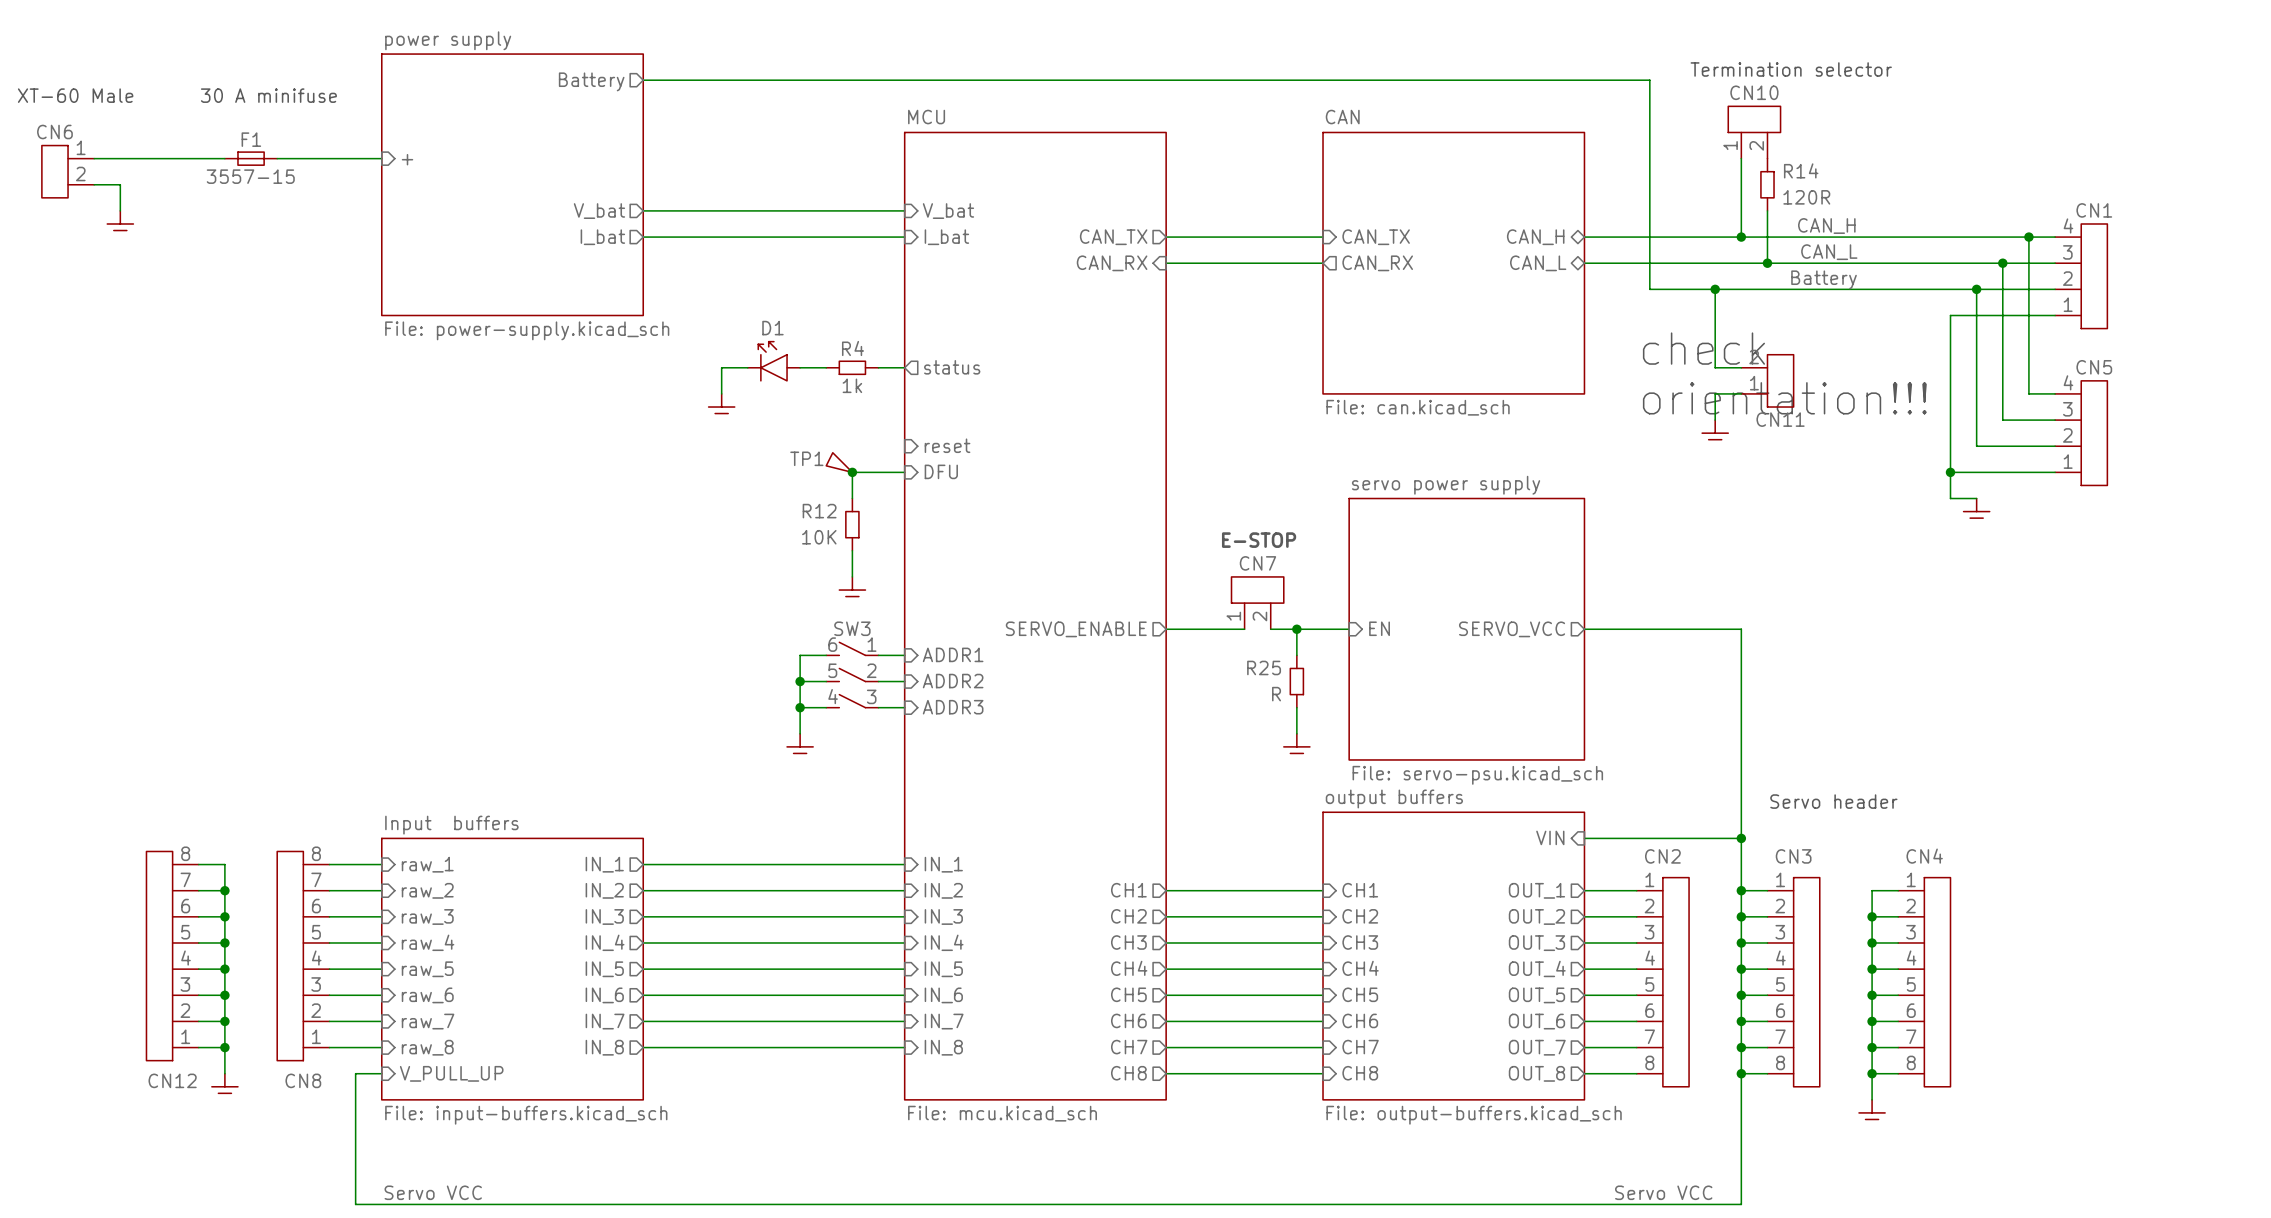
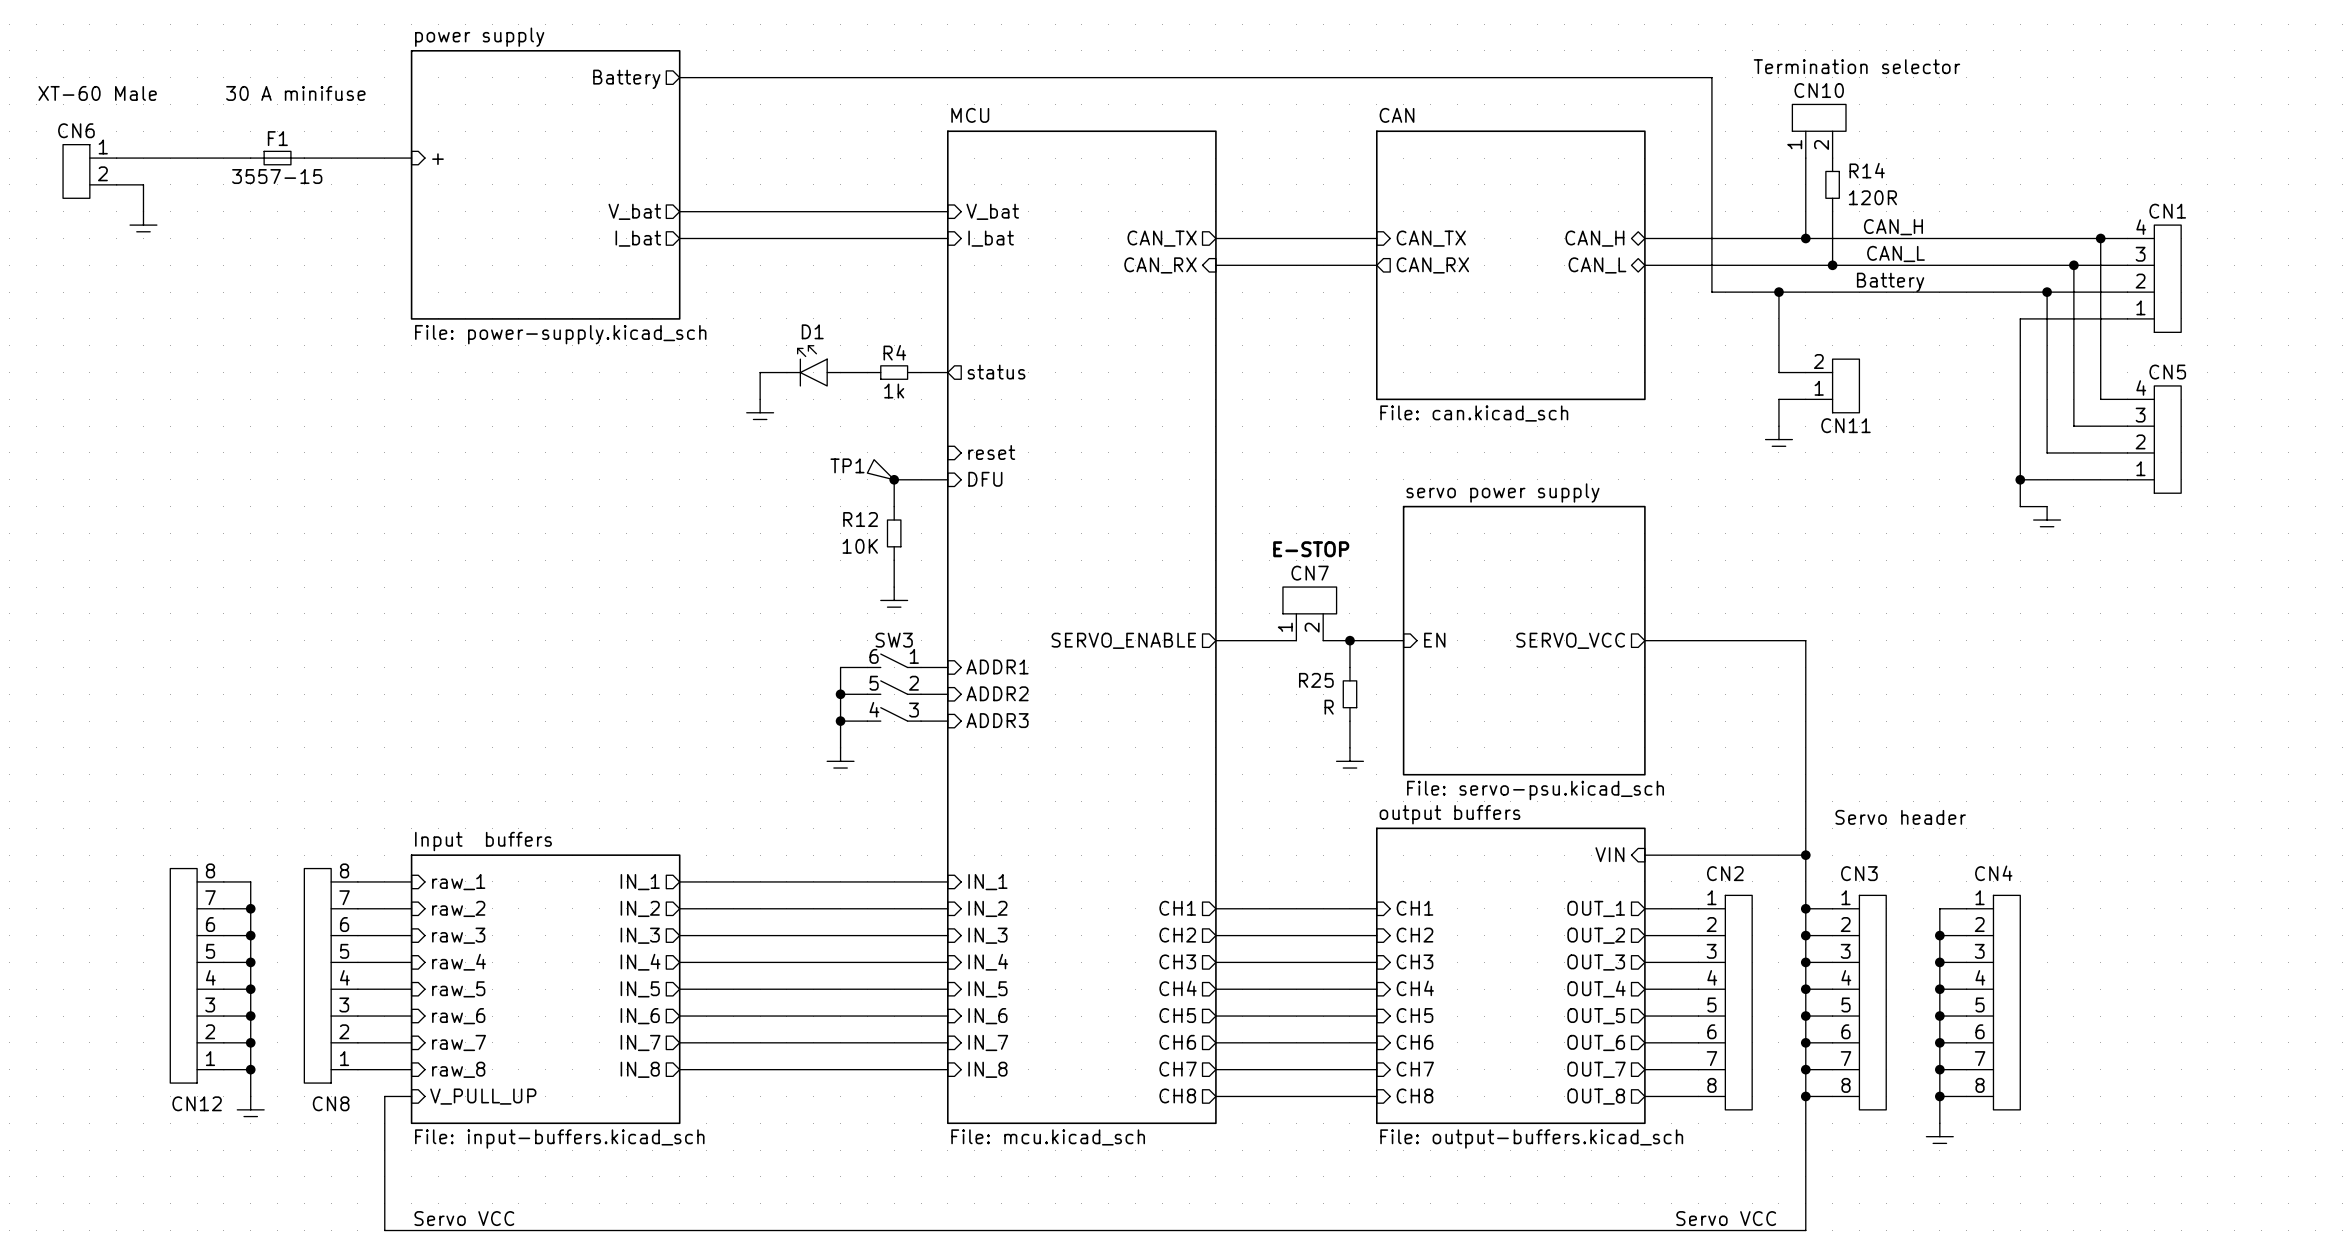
text: check (1703, 348) -> none
text: orientation!!! (1784, 398) -> none

